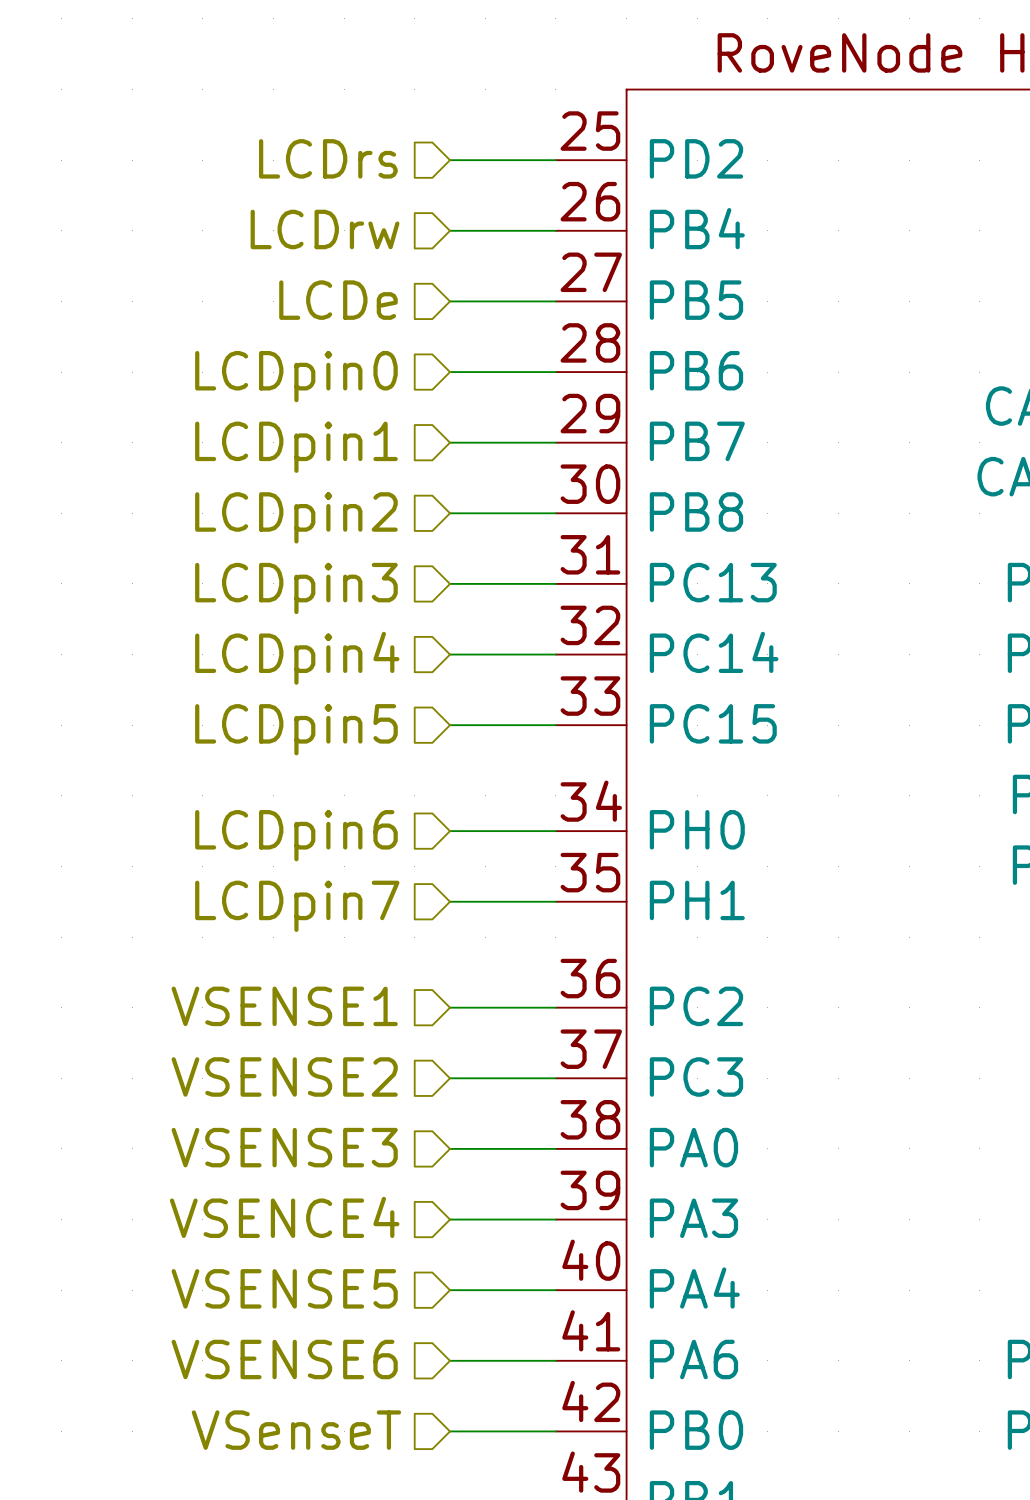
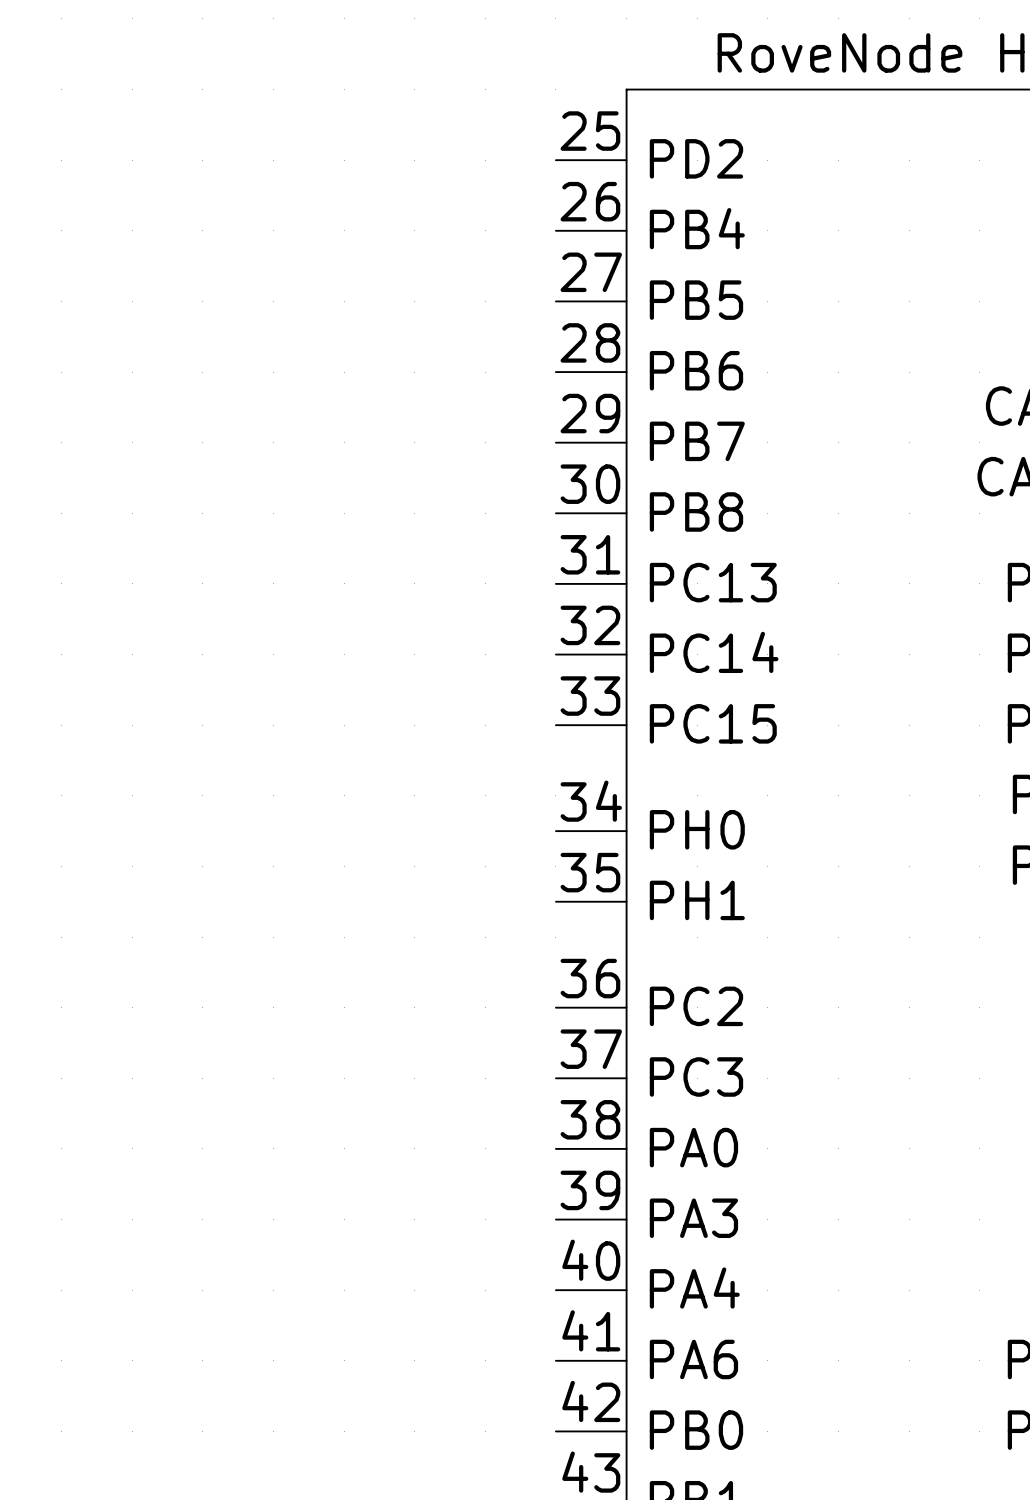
hierarchical label: LCDrs (328, 158) -> none
wire: (450, 160) (555, 160) -> none
hierarchical label: LCDrw (325, 229) -> none
wire: (450, 230) (555, 230) -> none
hierarchical label: LCDe (338, 300) -> none
wire: (450, 301) (555, 301) -> none
wire: (450, 372) (555, 372) -> none
hierarchical label: LCDpin0 (296, 376) -> none
wire: (450, 442) (555, 442) -> none
hierarchical label: LCDpin1 (296, 447) -> none
wire: (450, 513) (555, 513) -> none
hierarchical label: LCDpin2 (296, 517) -> none
wire: (450, 583) (555, 583) -> none
hierarchical label: LCDpin3 (296, 588) -> none
wire: (450, 654) (555, 654) -> none
hierarchical label: LCDpin4 (297, 658) -> none
wire: (450, 725) (555, 725) -> none
hierarchical label: LCDpin5 (296, 729) -> none
wire: (450, 831) (555, 831) -> none
hierarchical label: LCDpin6 (296, 835) -> none
wire: (450, 901) (555, 901) -> none
hierarchical label: LCDpin7 (297, 906) -> none
hierarchical label: VSENSE1 (284, 1006) -> none
wire: (450, 1007) (555, 1007) -> none
hierarchical label: VSENSE2 (284, 1076) -> none
wire: (450, 1078) (555, 1078) -> none
hierarchical label: VSENSE3 (284, 1147) -> none
wire: (450, 1148) (555, 1148) -> none
hierarchical label: VSENCE4 (284, 1217) -> none
wire: (450, 1219) (555, 1219) -> none
hierarchical label: VSENSE5 (284, 1288) -> none
wire: (450, 1290) (555, 1290) -> none
hierarchical label: VSENSE6 (284, 1359) -> none
wire: (450, 1360) (555, 1360) -> none
hierarchical label: VSenseT (296, 1430) -> none
wire: (450, 1431) (555, 1431) -> none

